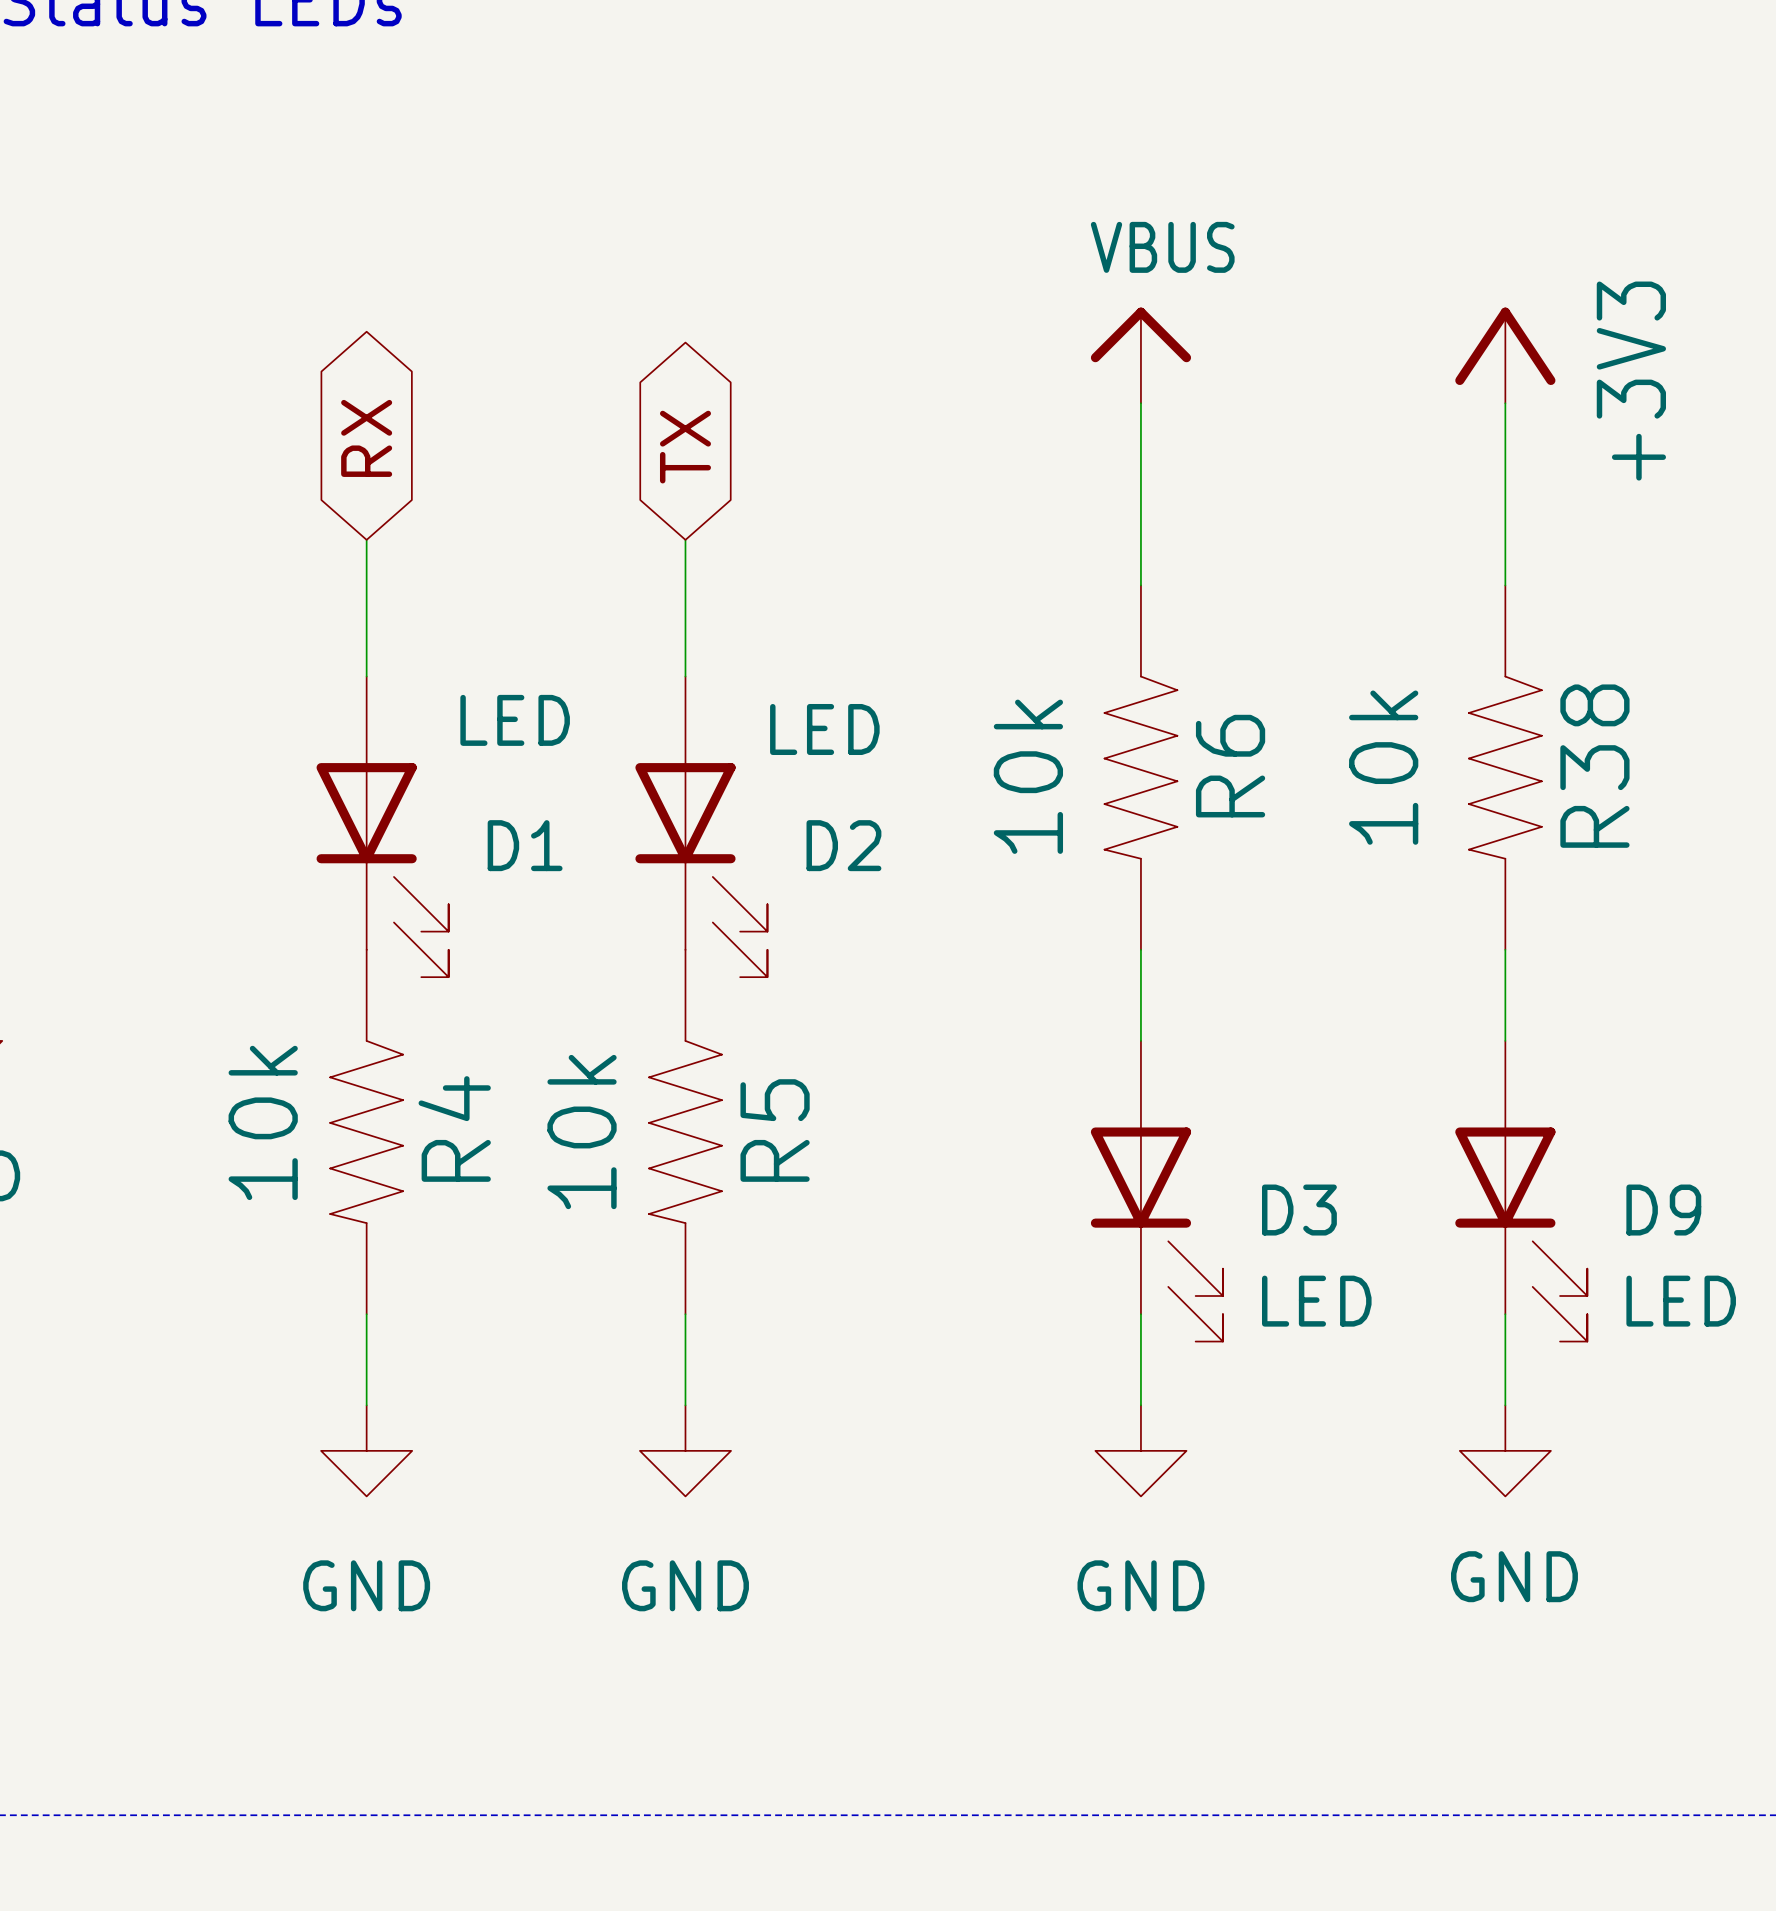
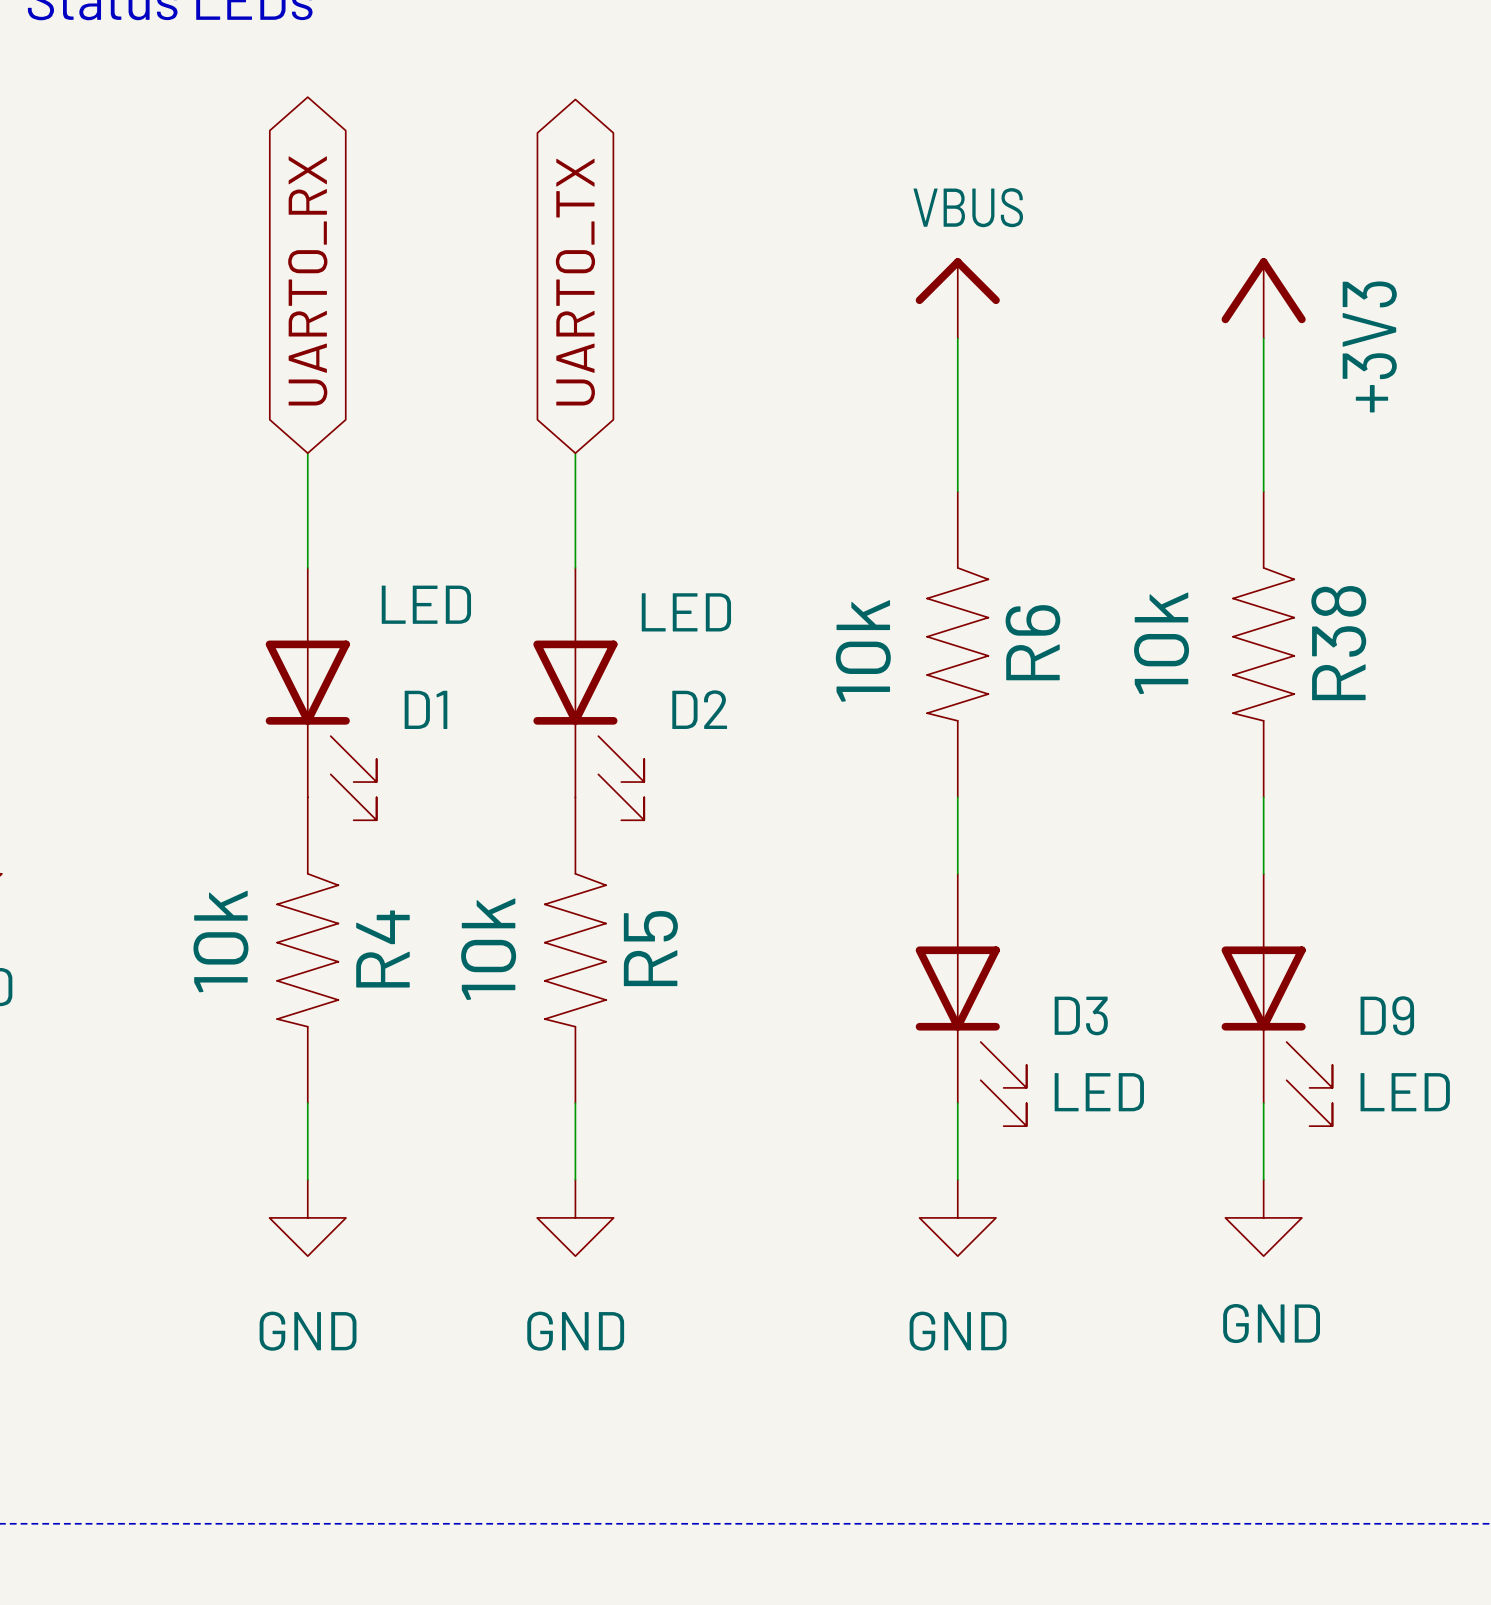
global label: RX (366, 438) -> UART0_RX (307, 280)
global label: TX (685, 447) -> UART0_TX (575, 282)

